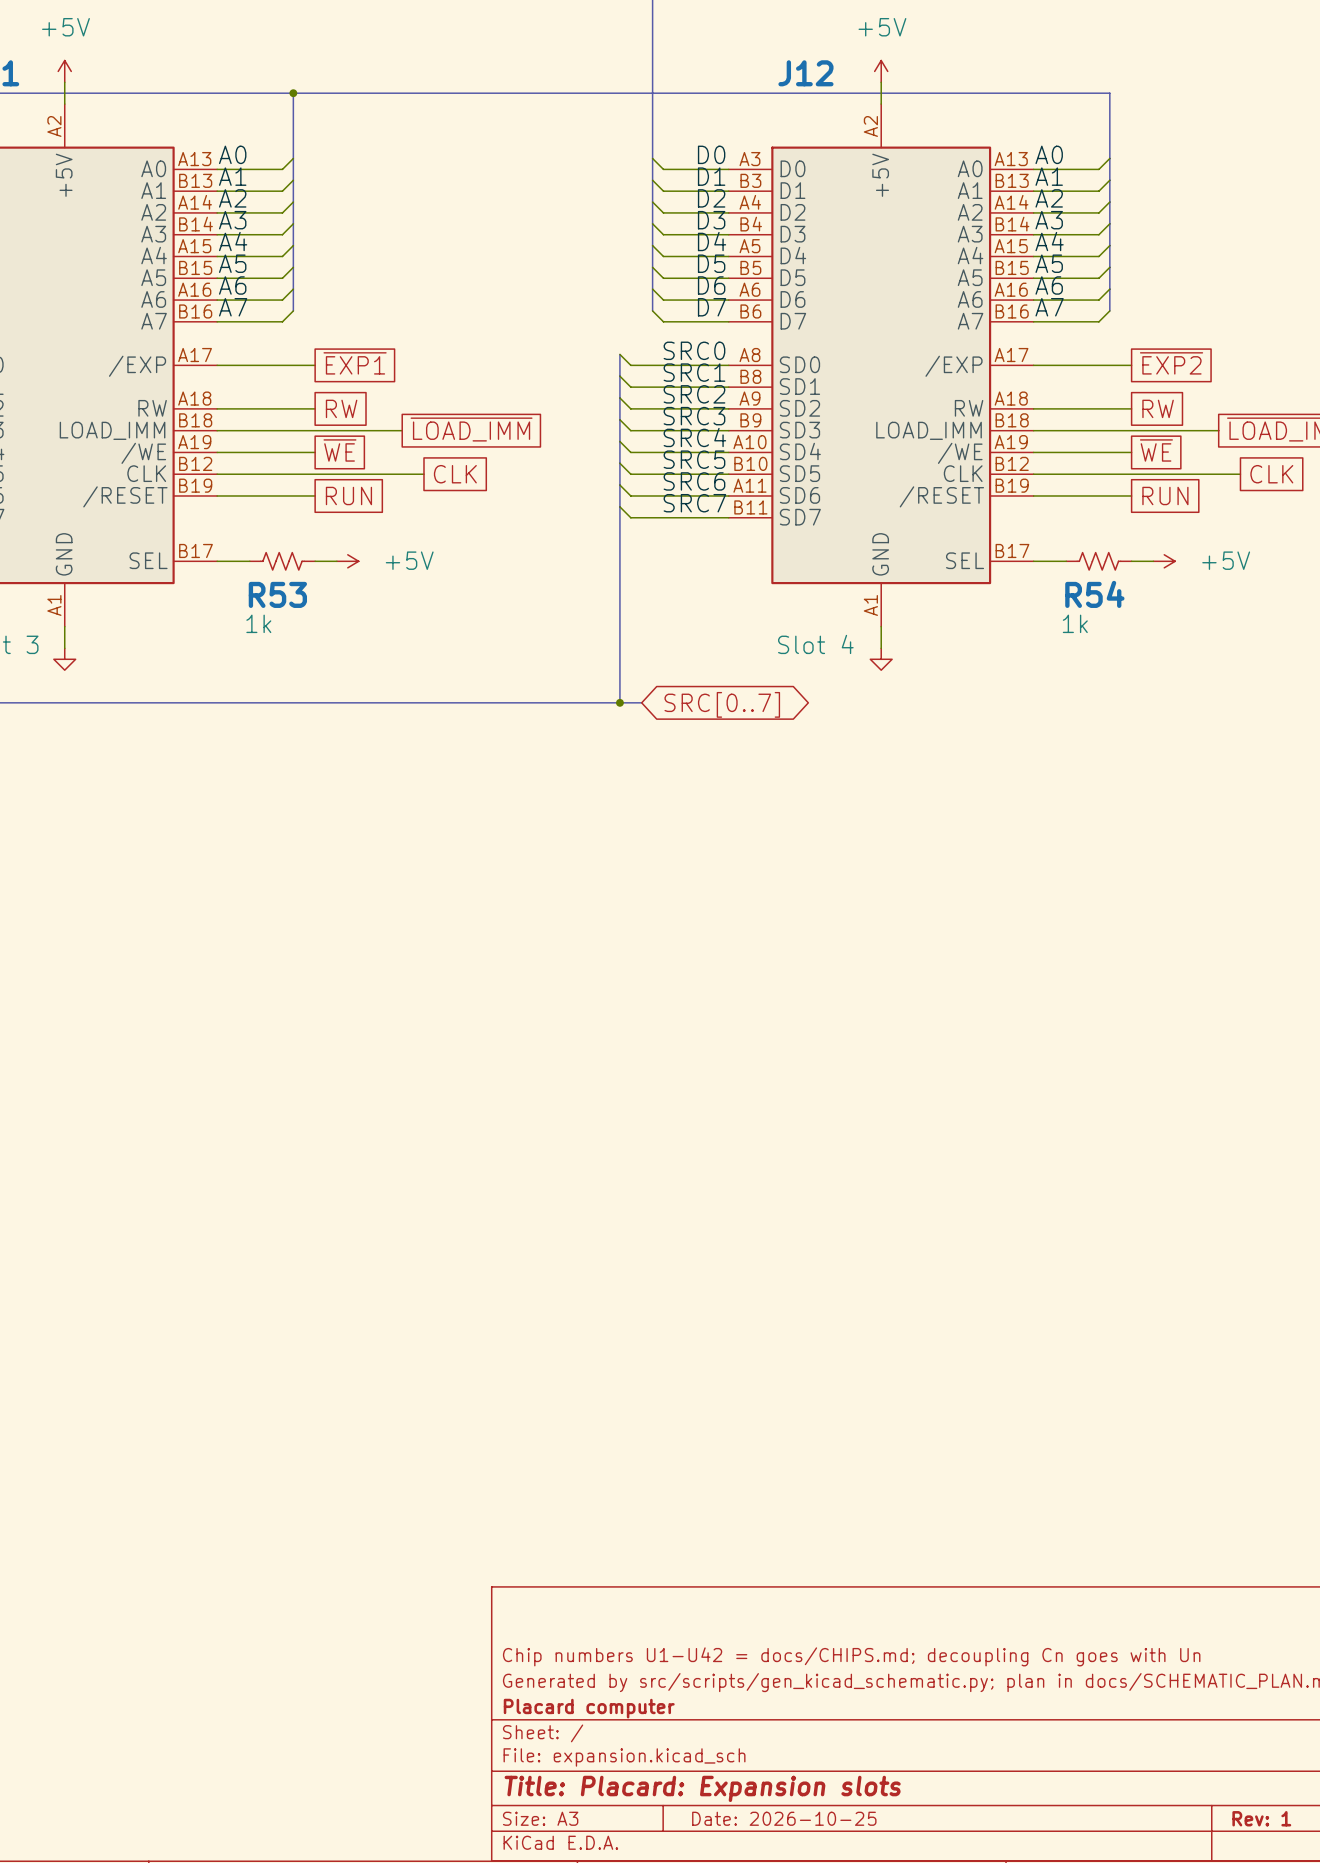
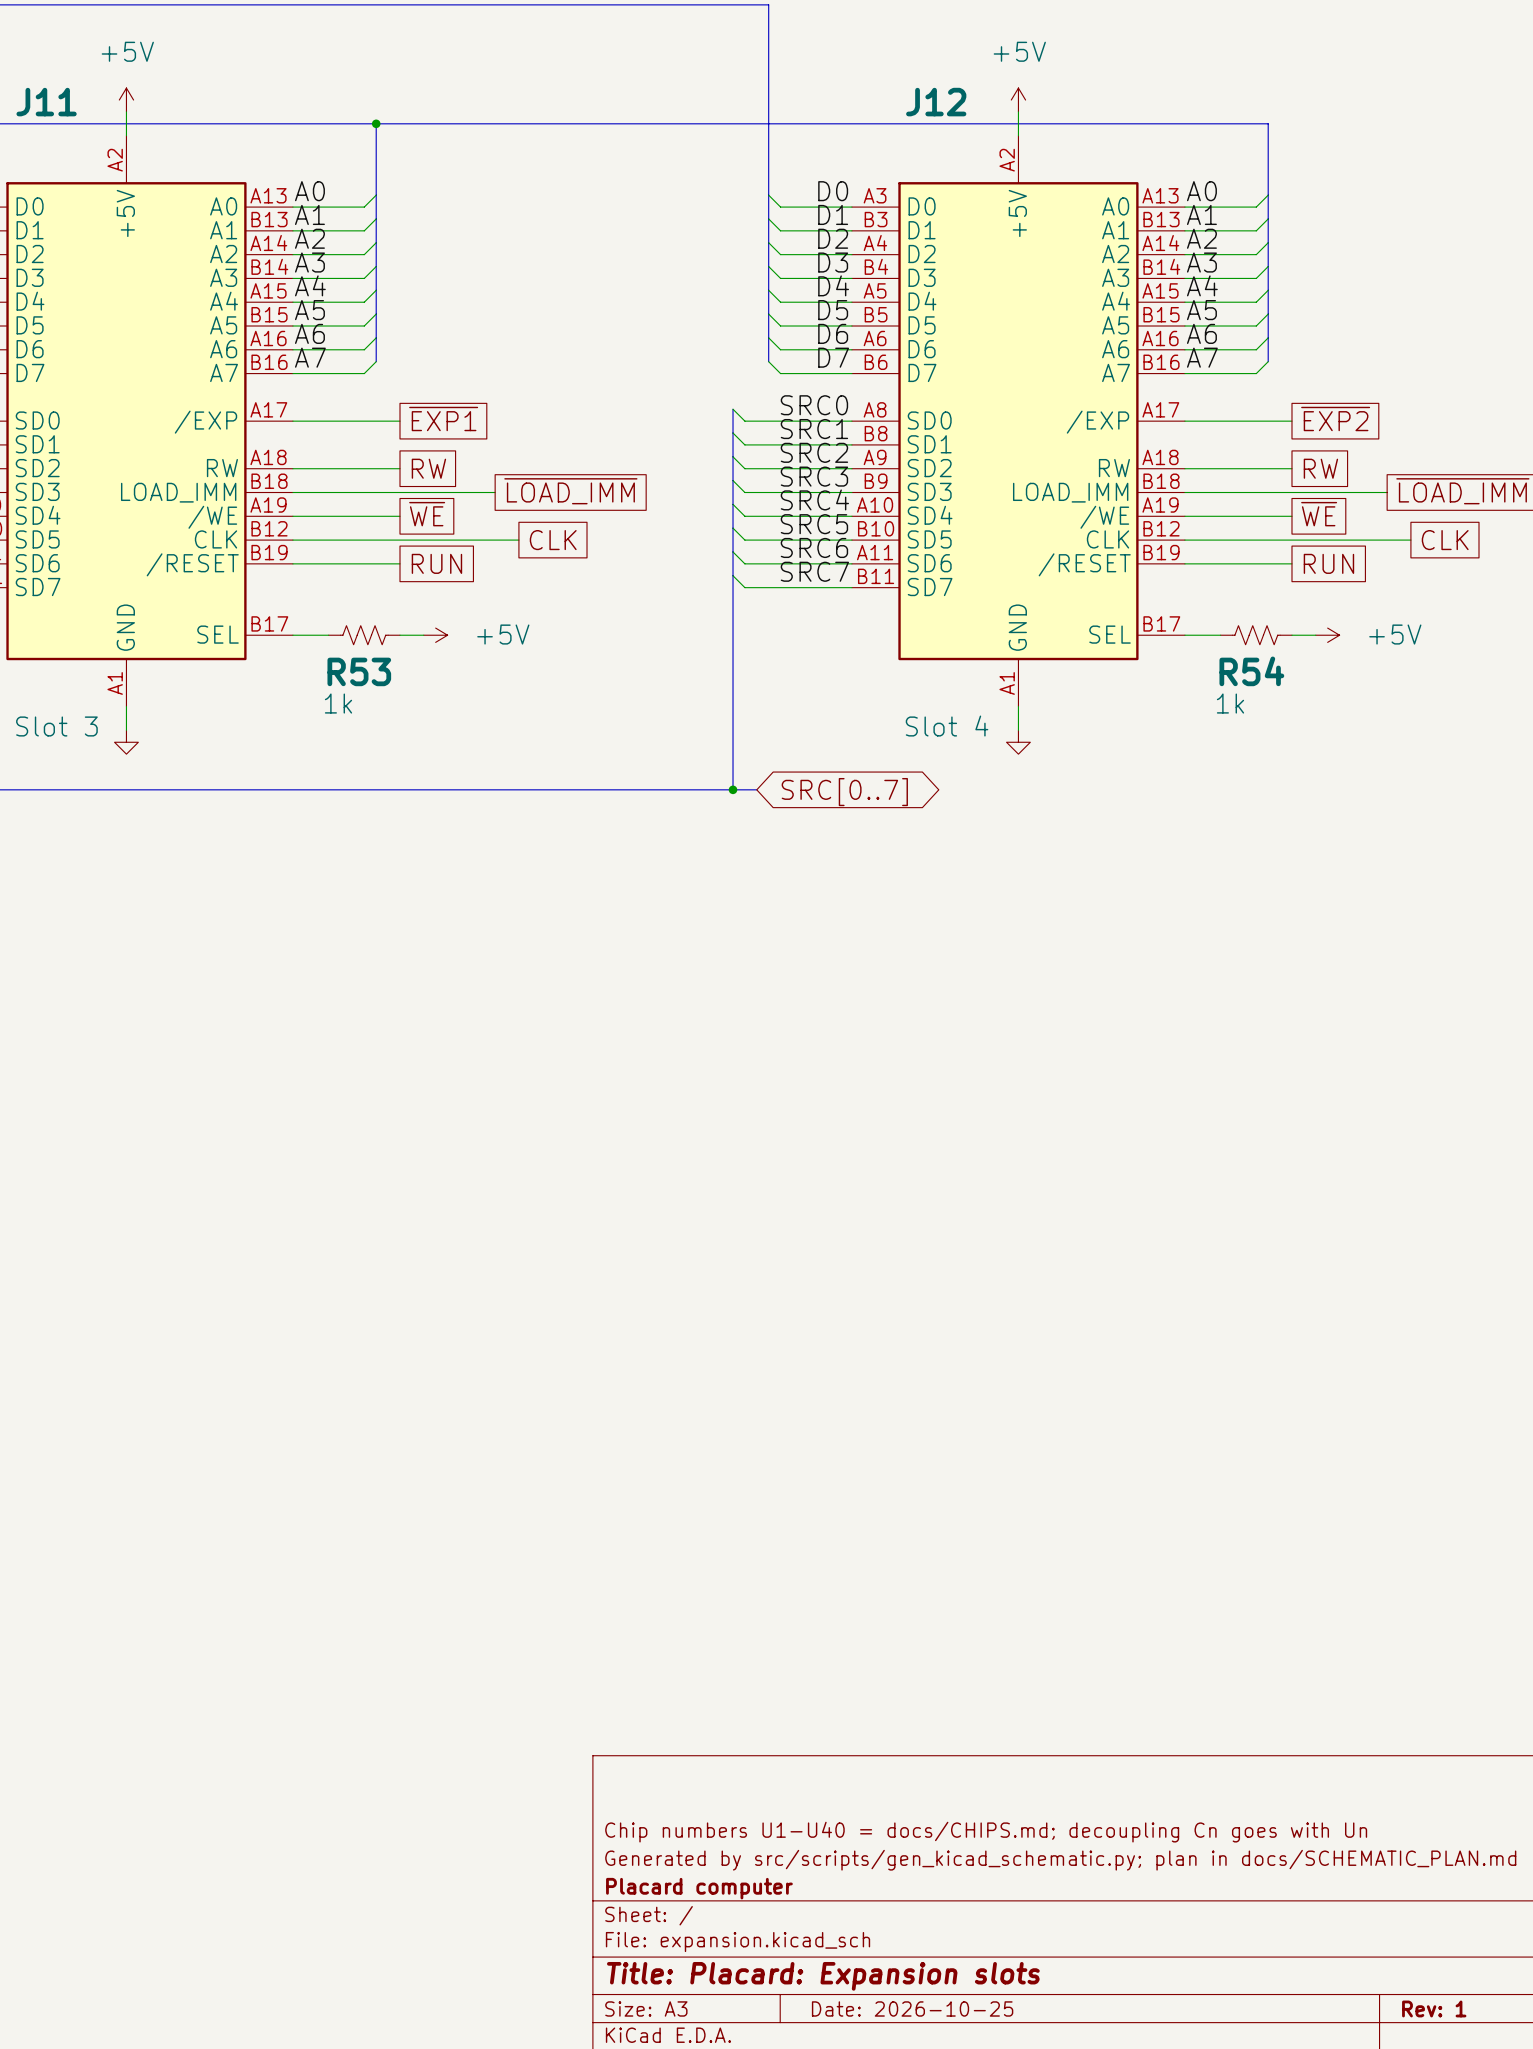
title block: Chip numbers U1-U42 = docs/CHIPS.md; decoupling Cn goes with Un (851, 1656) -> Chip numbers U1-U40 = docs/CHIPS.md; decoupling Cn goes with Un (986, 1832)

